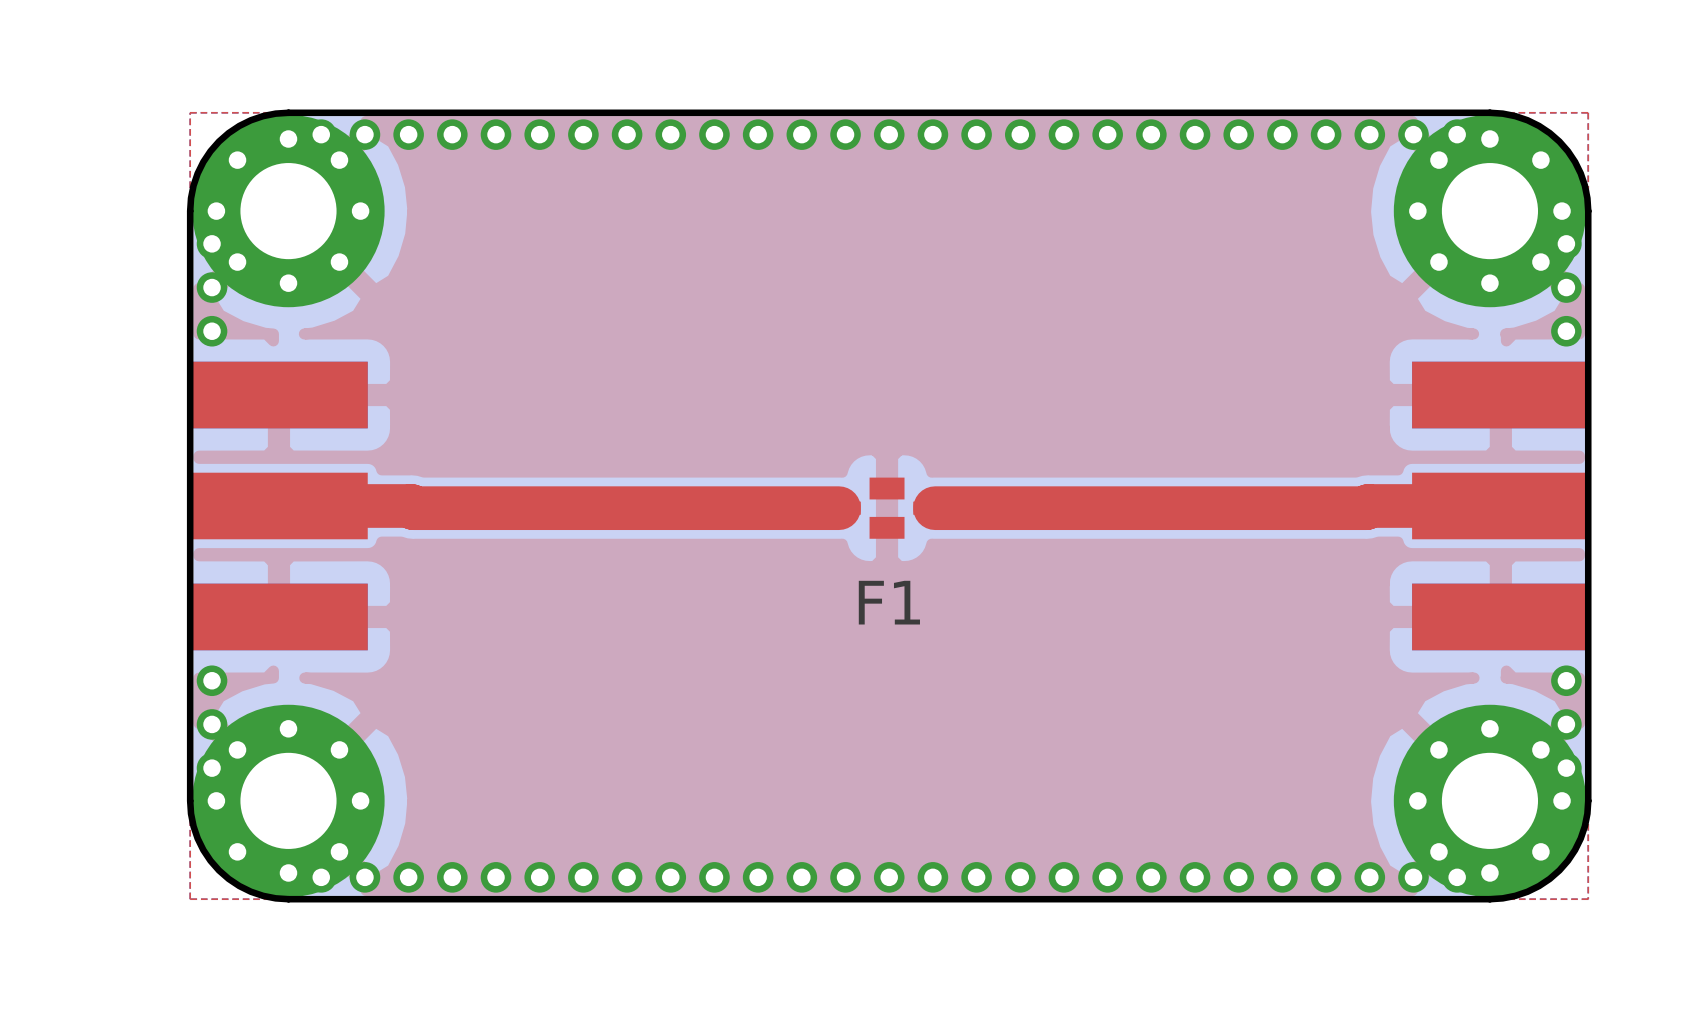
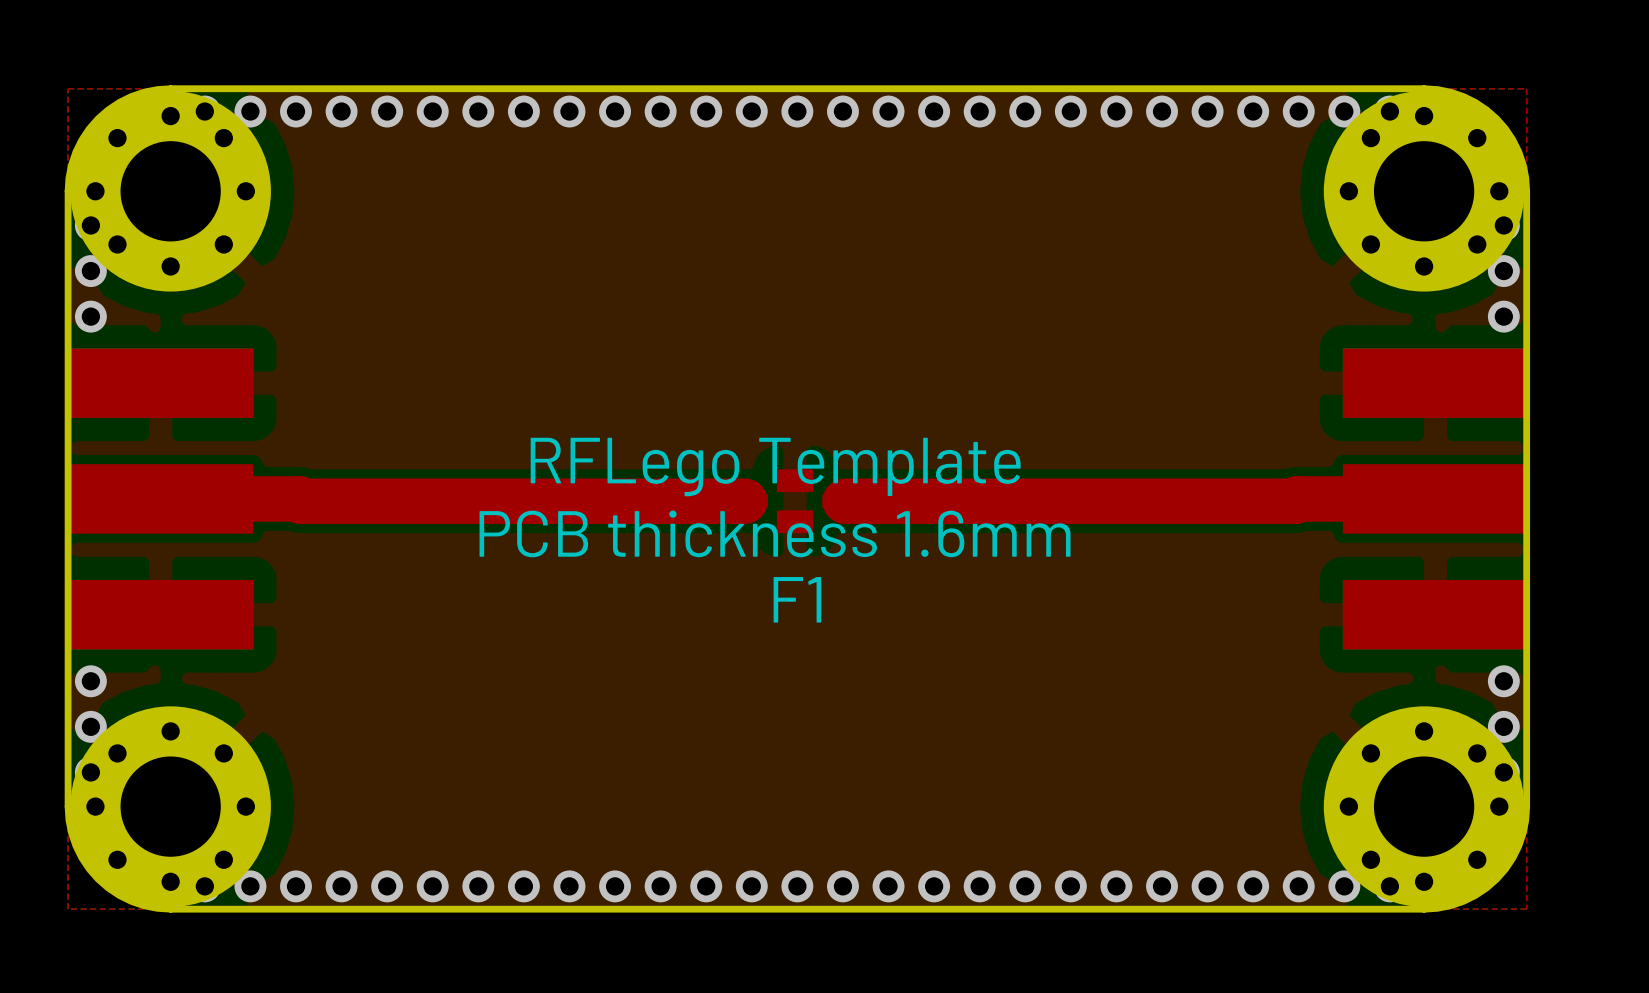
text: none -> RFLego Template (775, 467)
text: none -> PCB thickness 1.6mm (775, 533)

